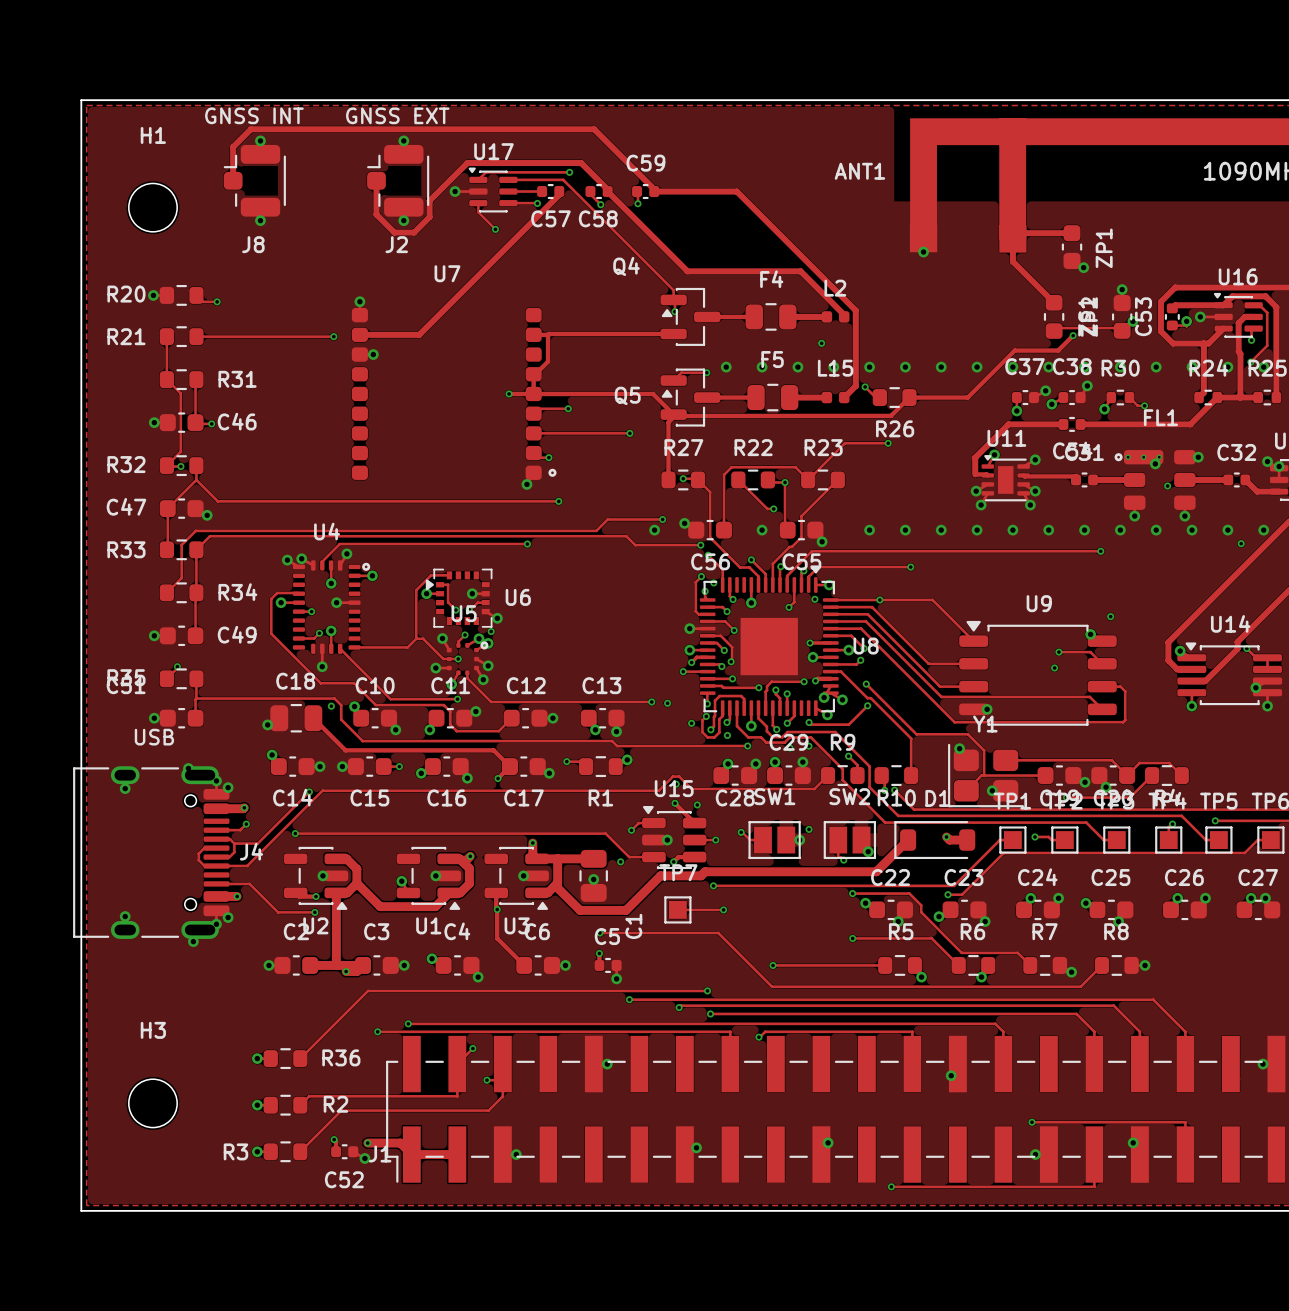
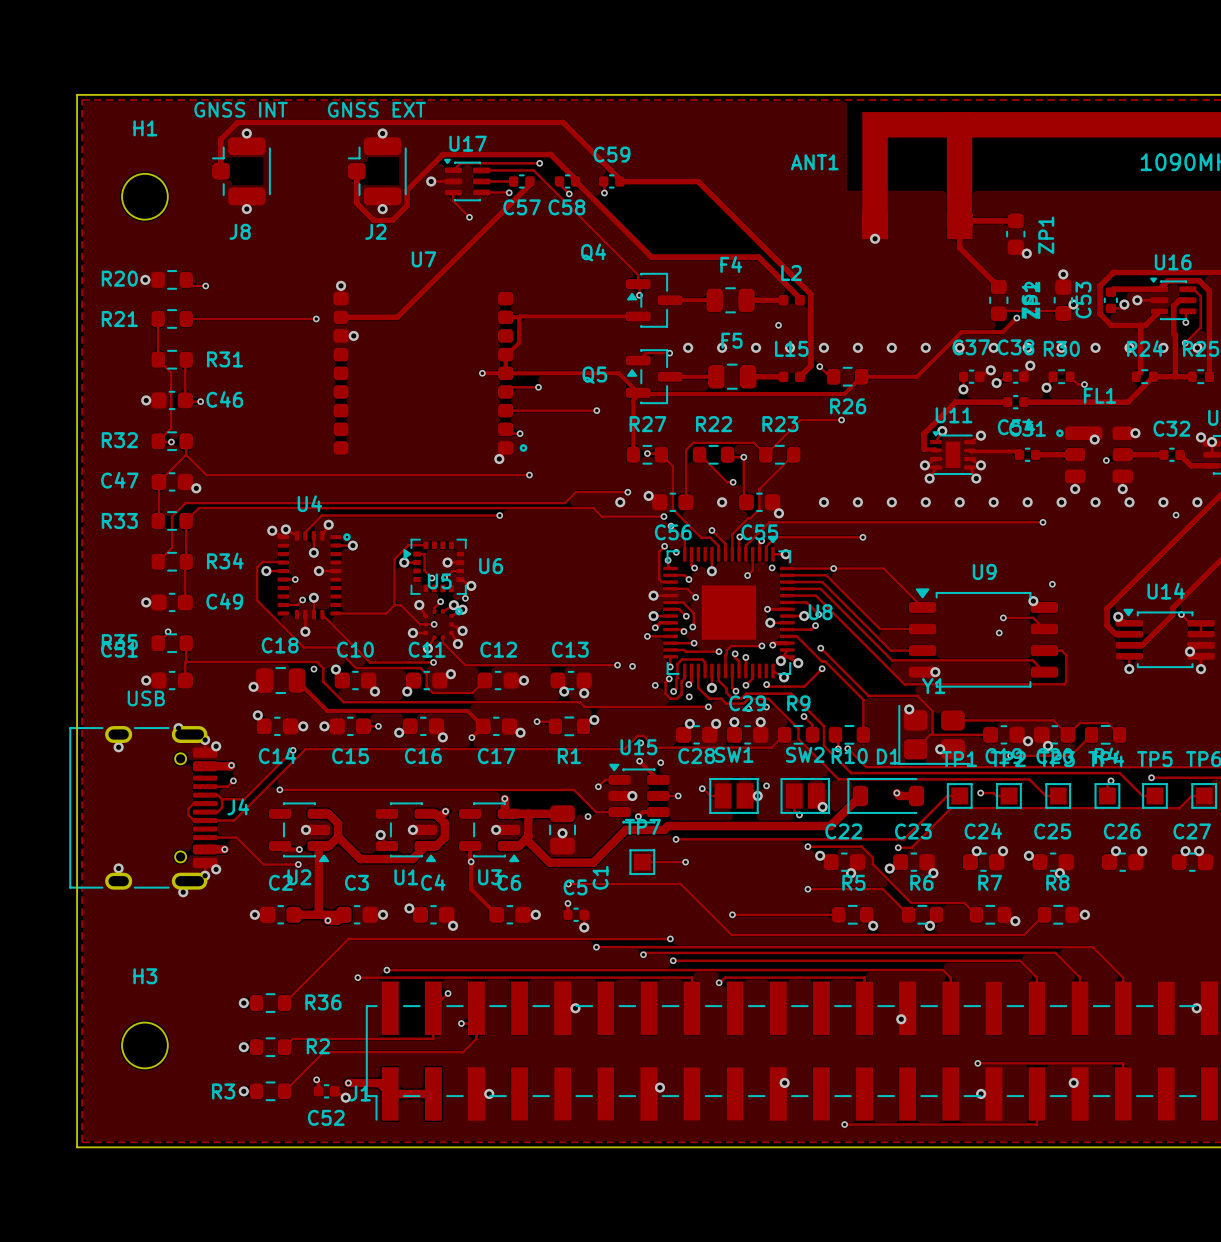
via: (1128, 457) -> none
via: (1143, 457) -> none
via: (1159, 457) -> none

